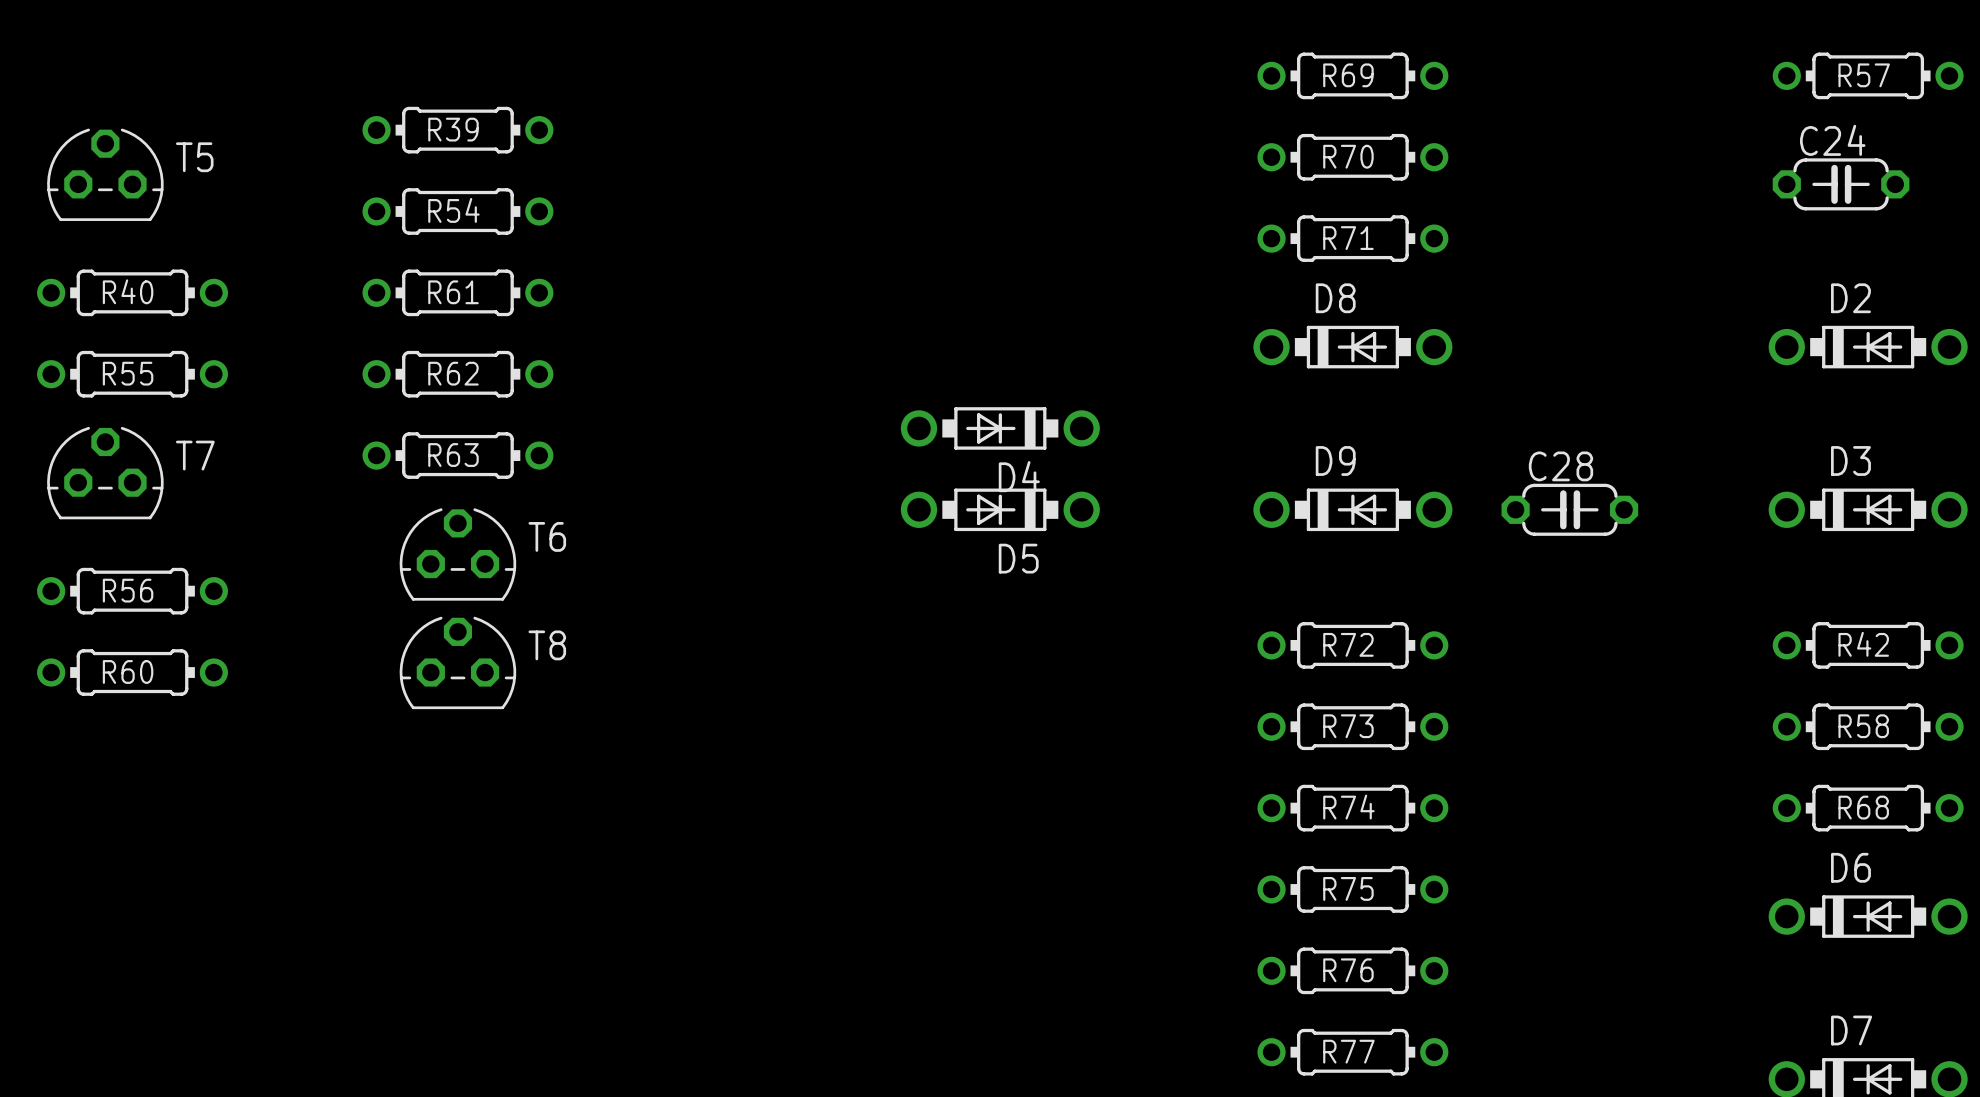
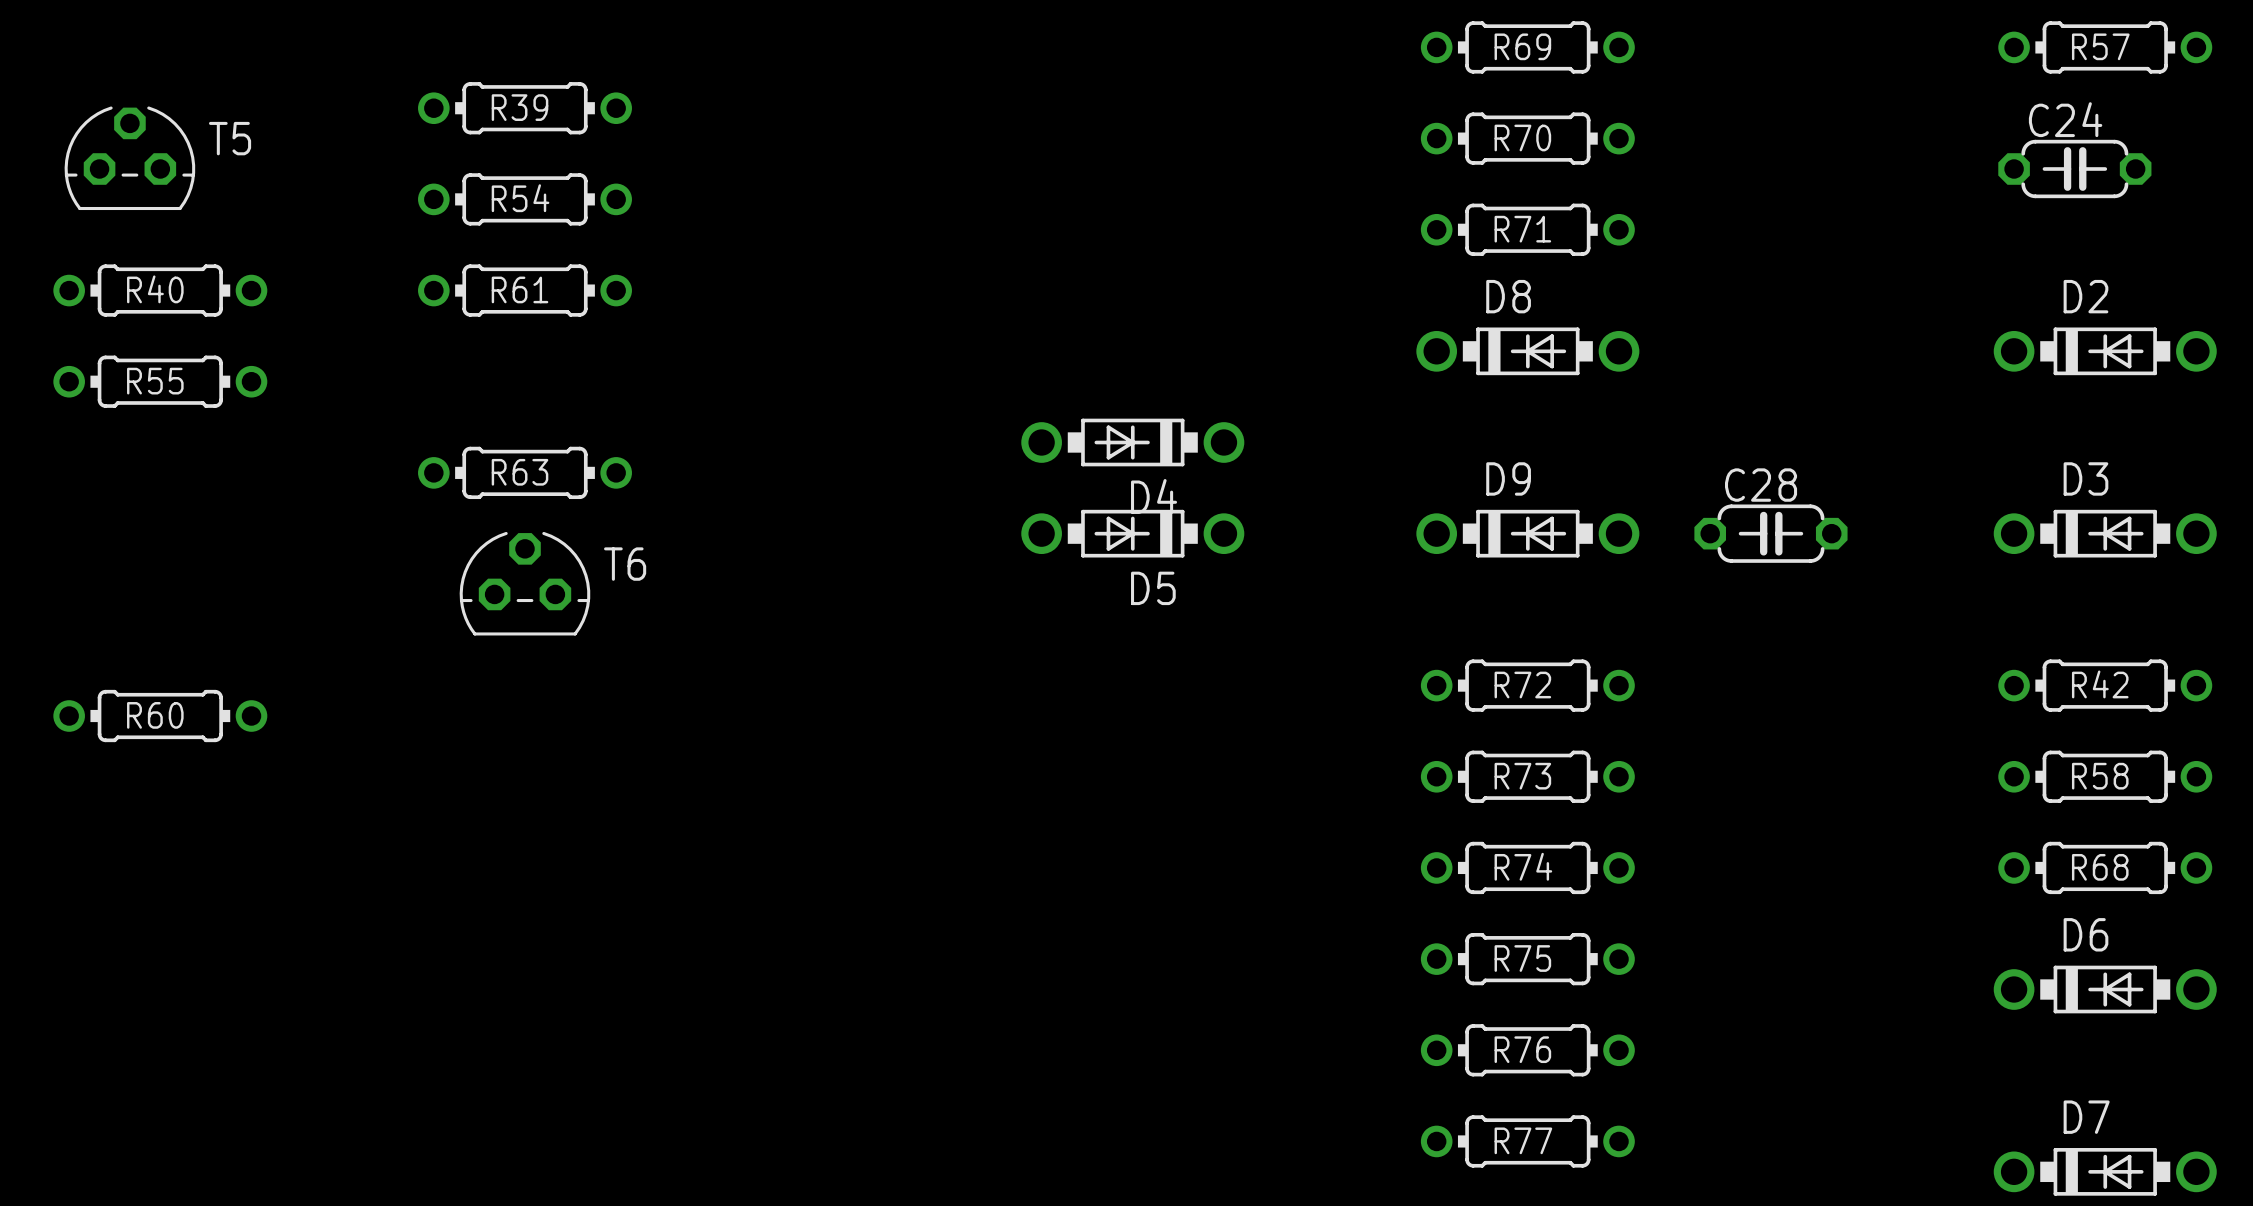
R62: (457, 374) -> none
T7: (105, 473) -> none
R56: (132, 591) -> none
T8: (457, 662) -> none

